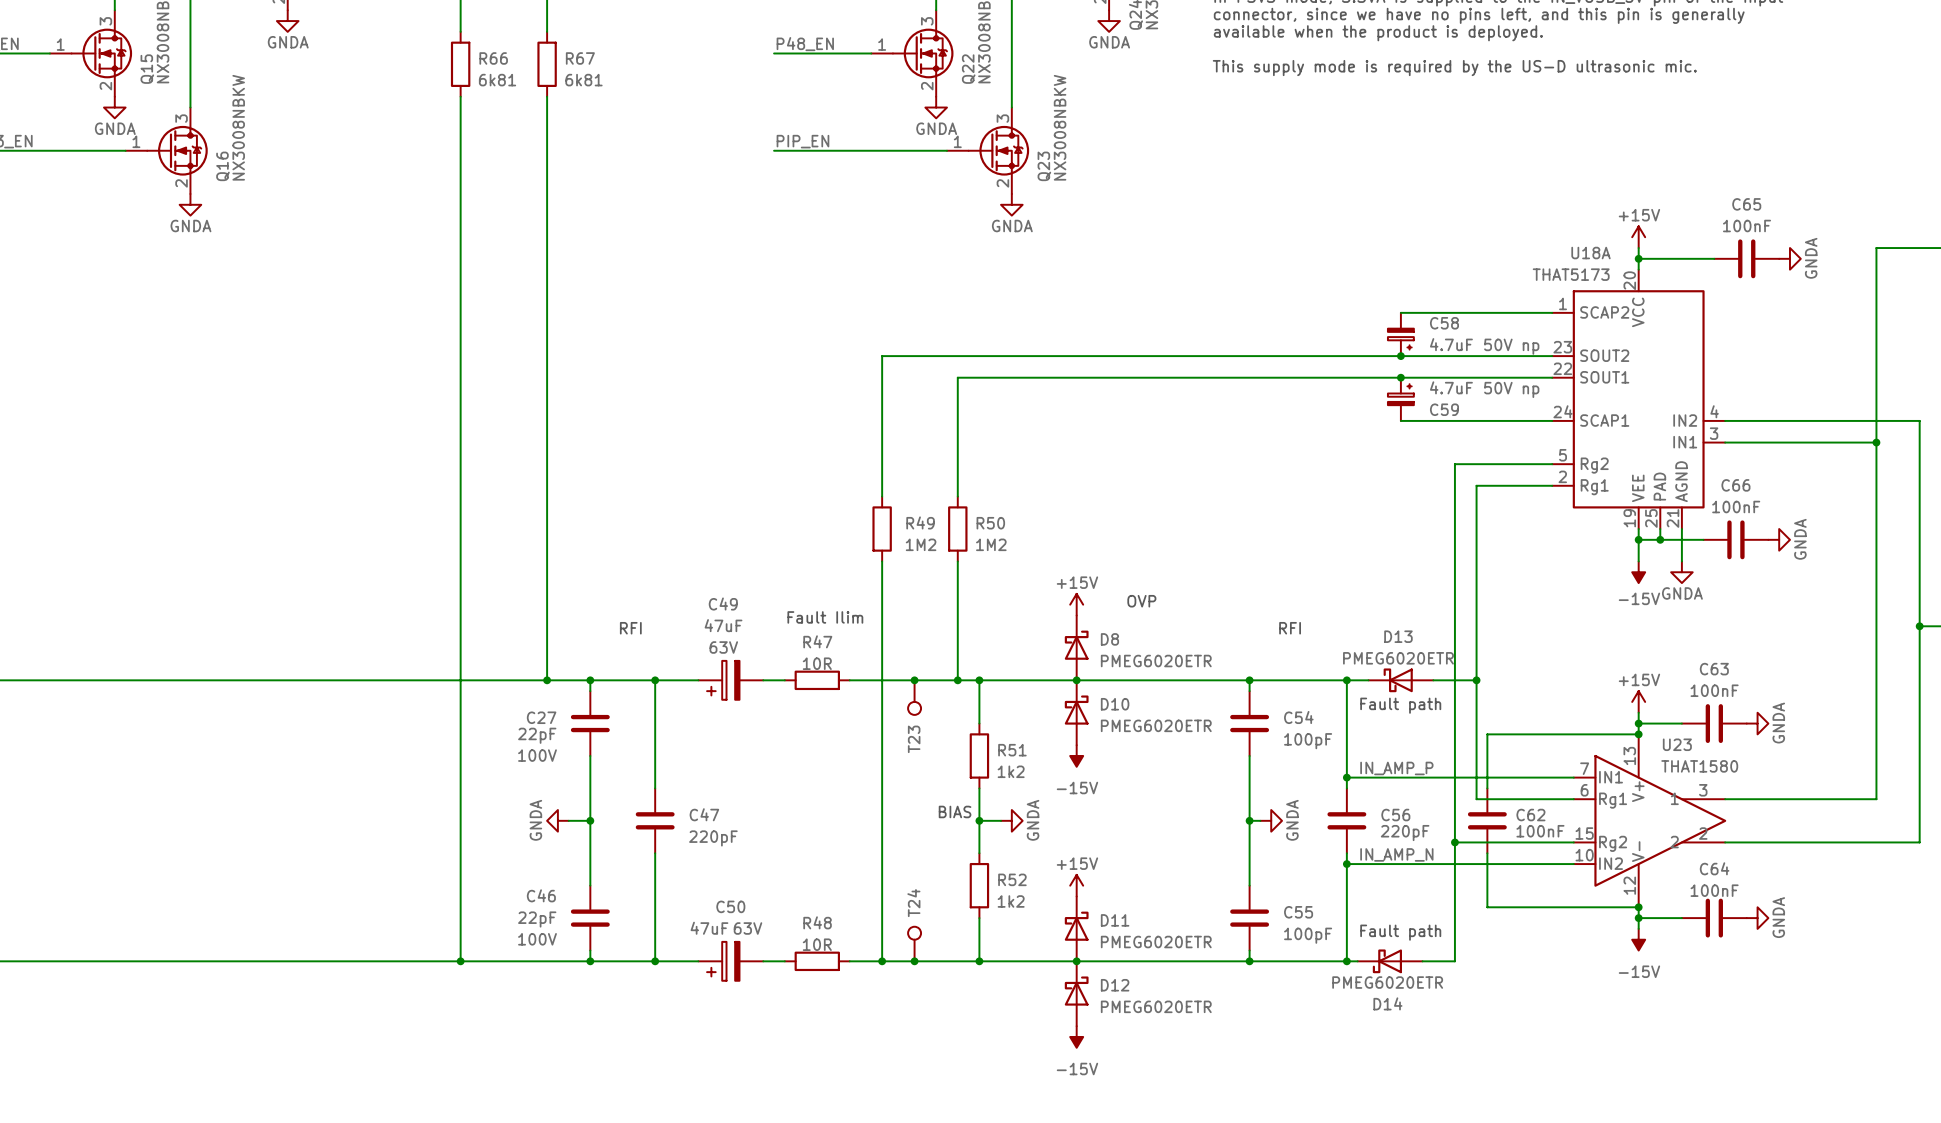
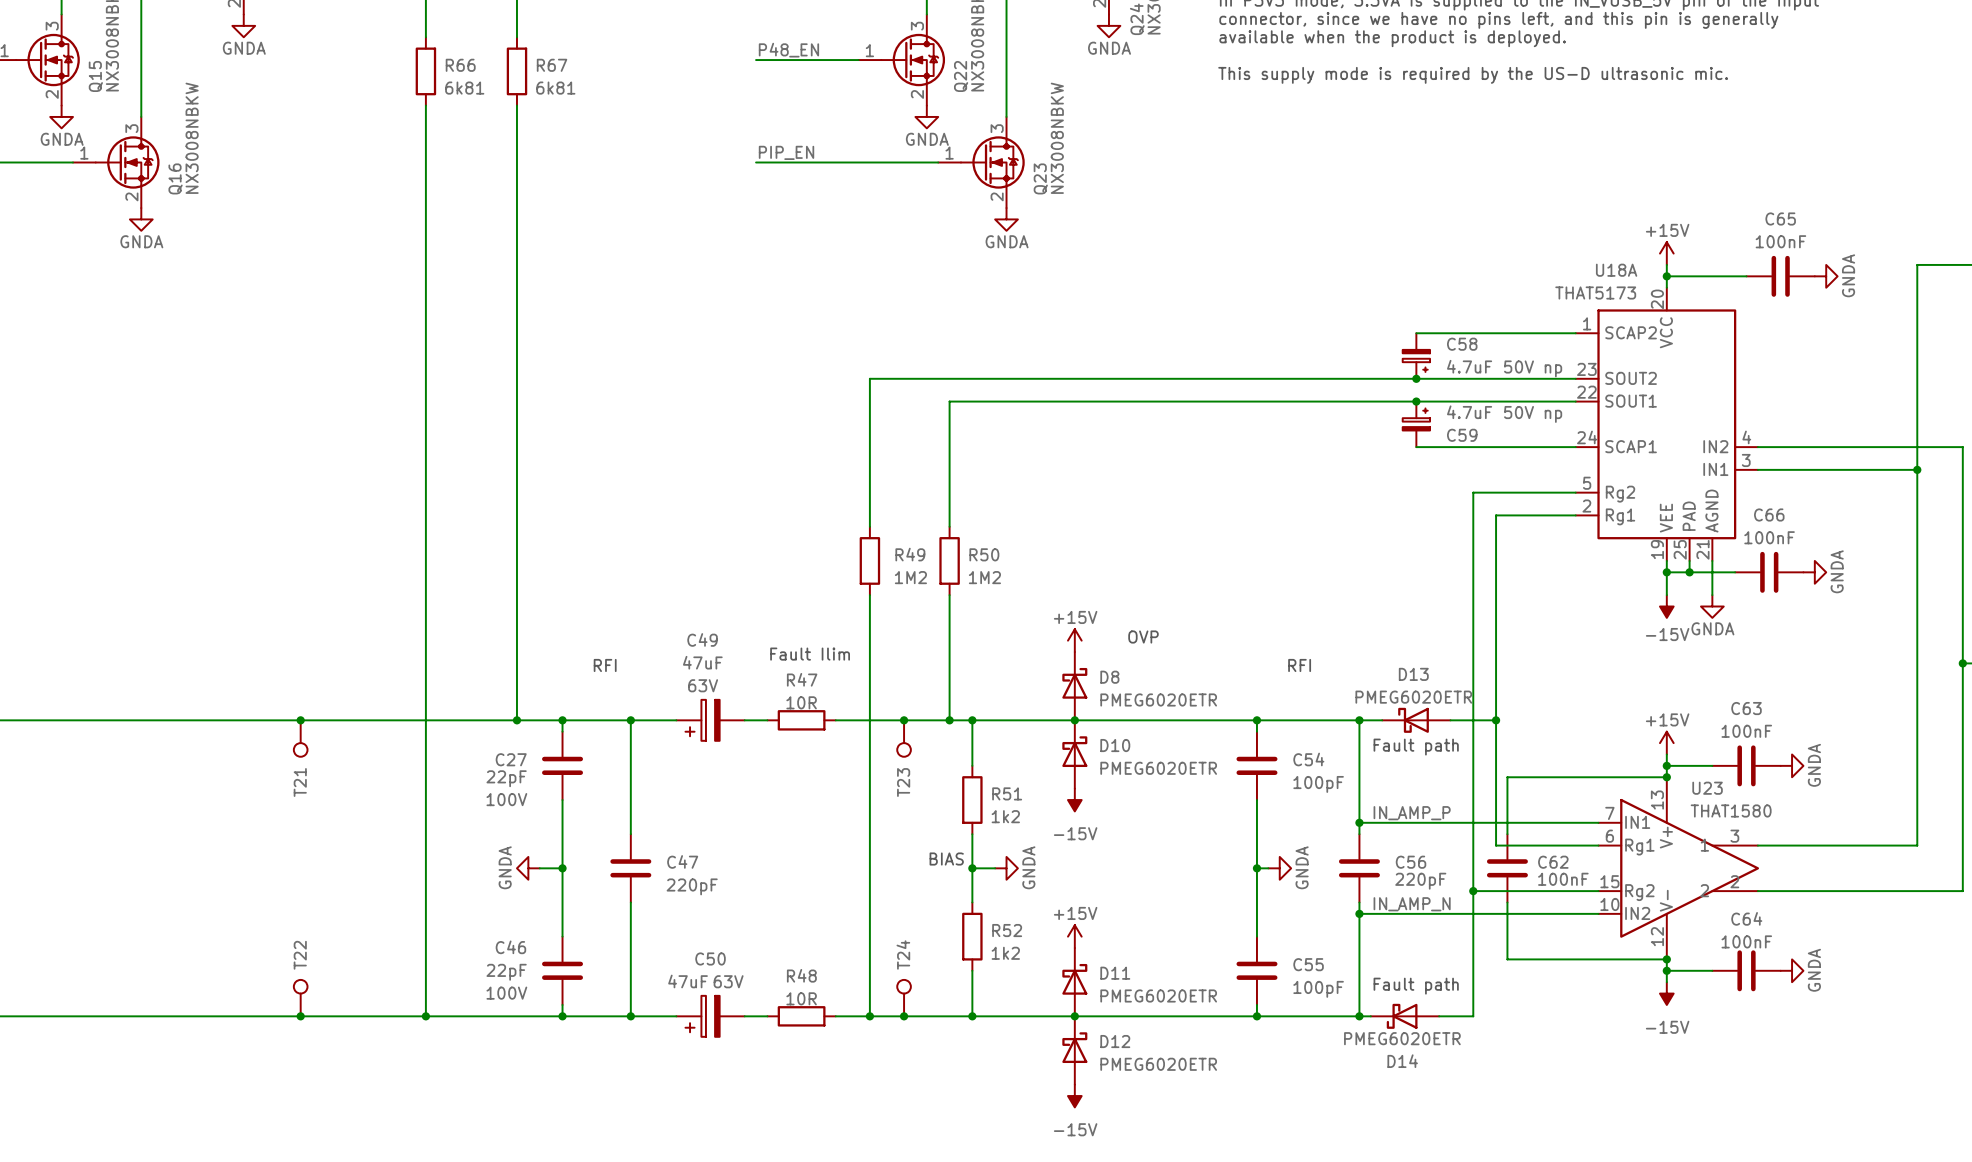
junction: none -> (300, 720)
T21: none -> (300, 738)
T22: none -> (300, 998)
junction: none -> (300, 1016)

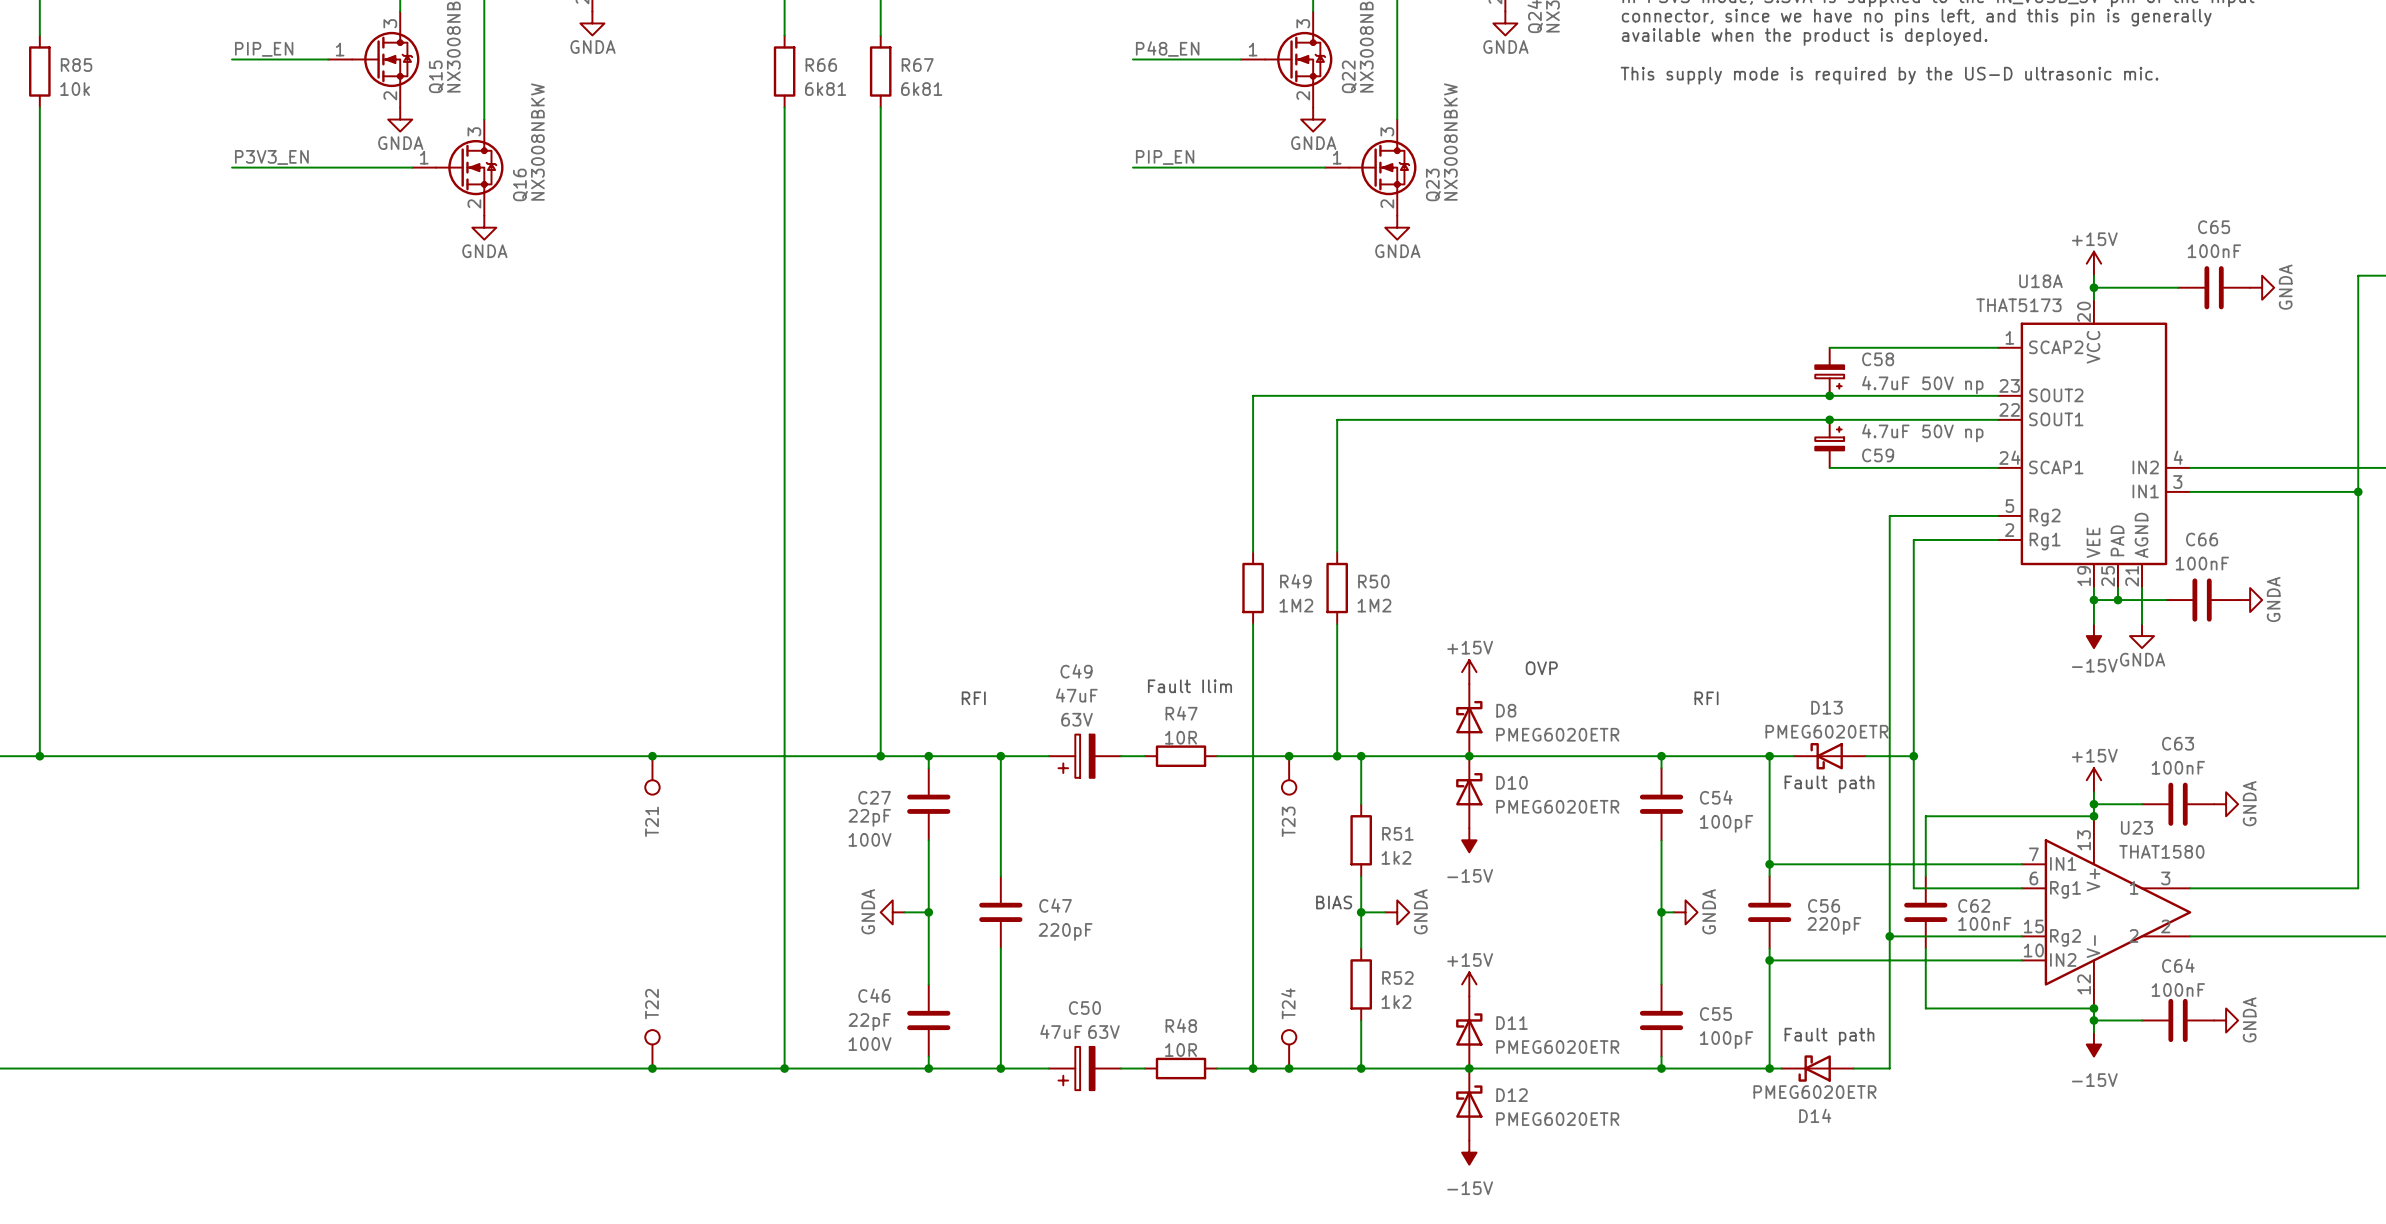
label: IN_AMP_P (1412, 813) -> none
label: IN_AMP_N (1412, 904) -> none

